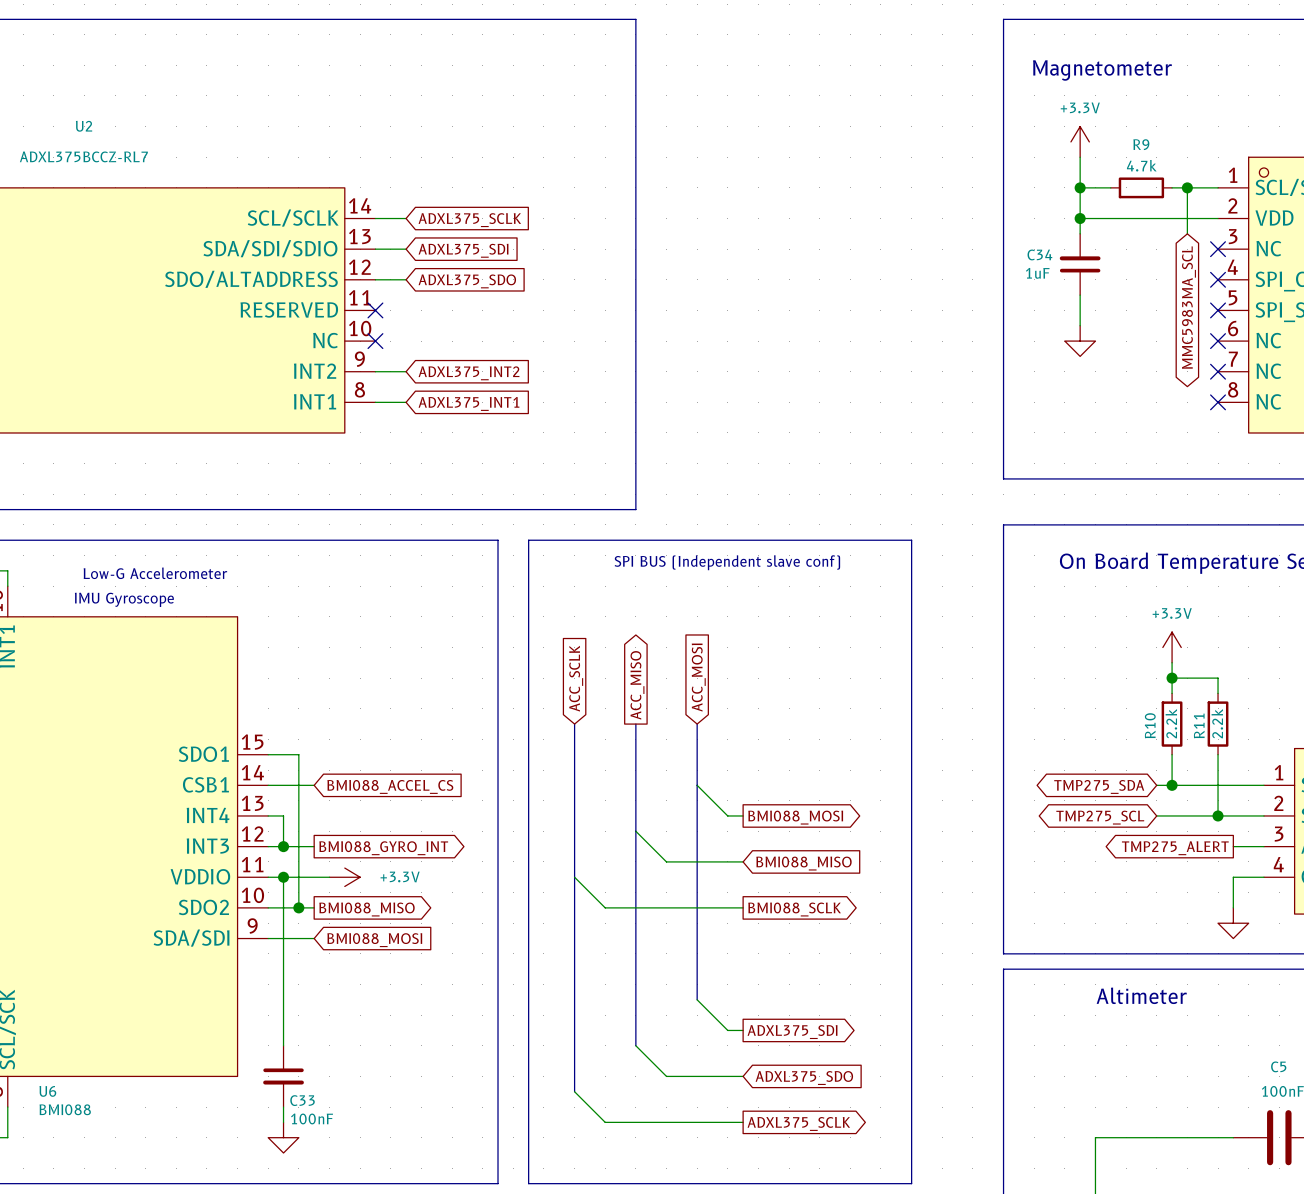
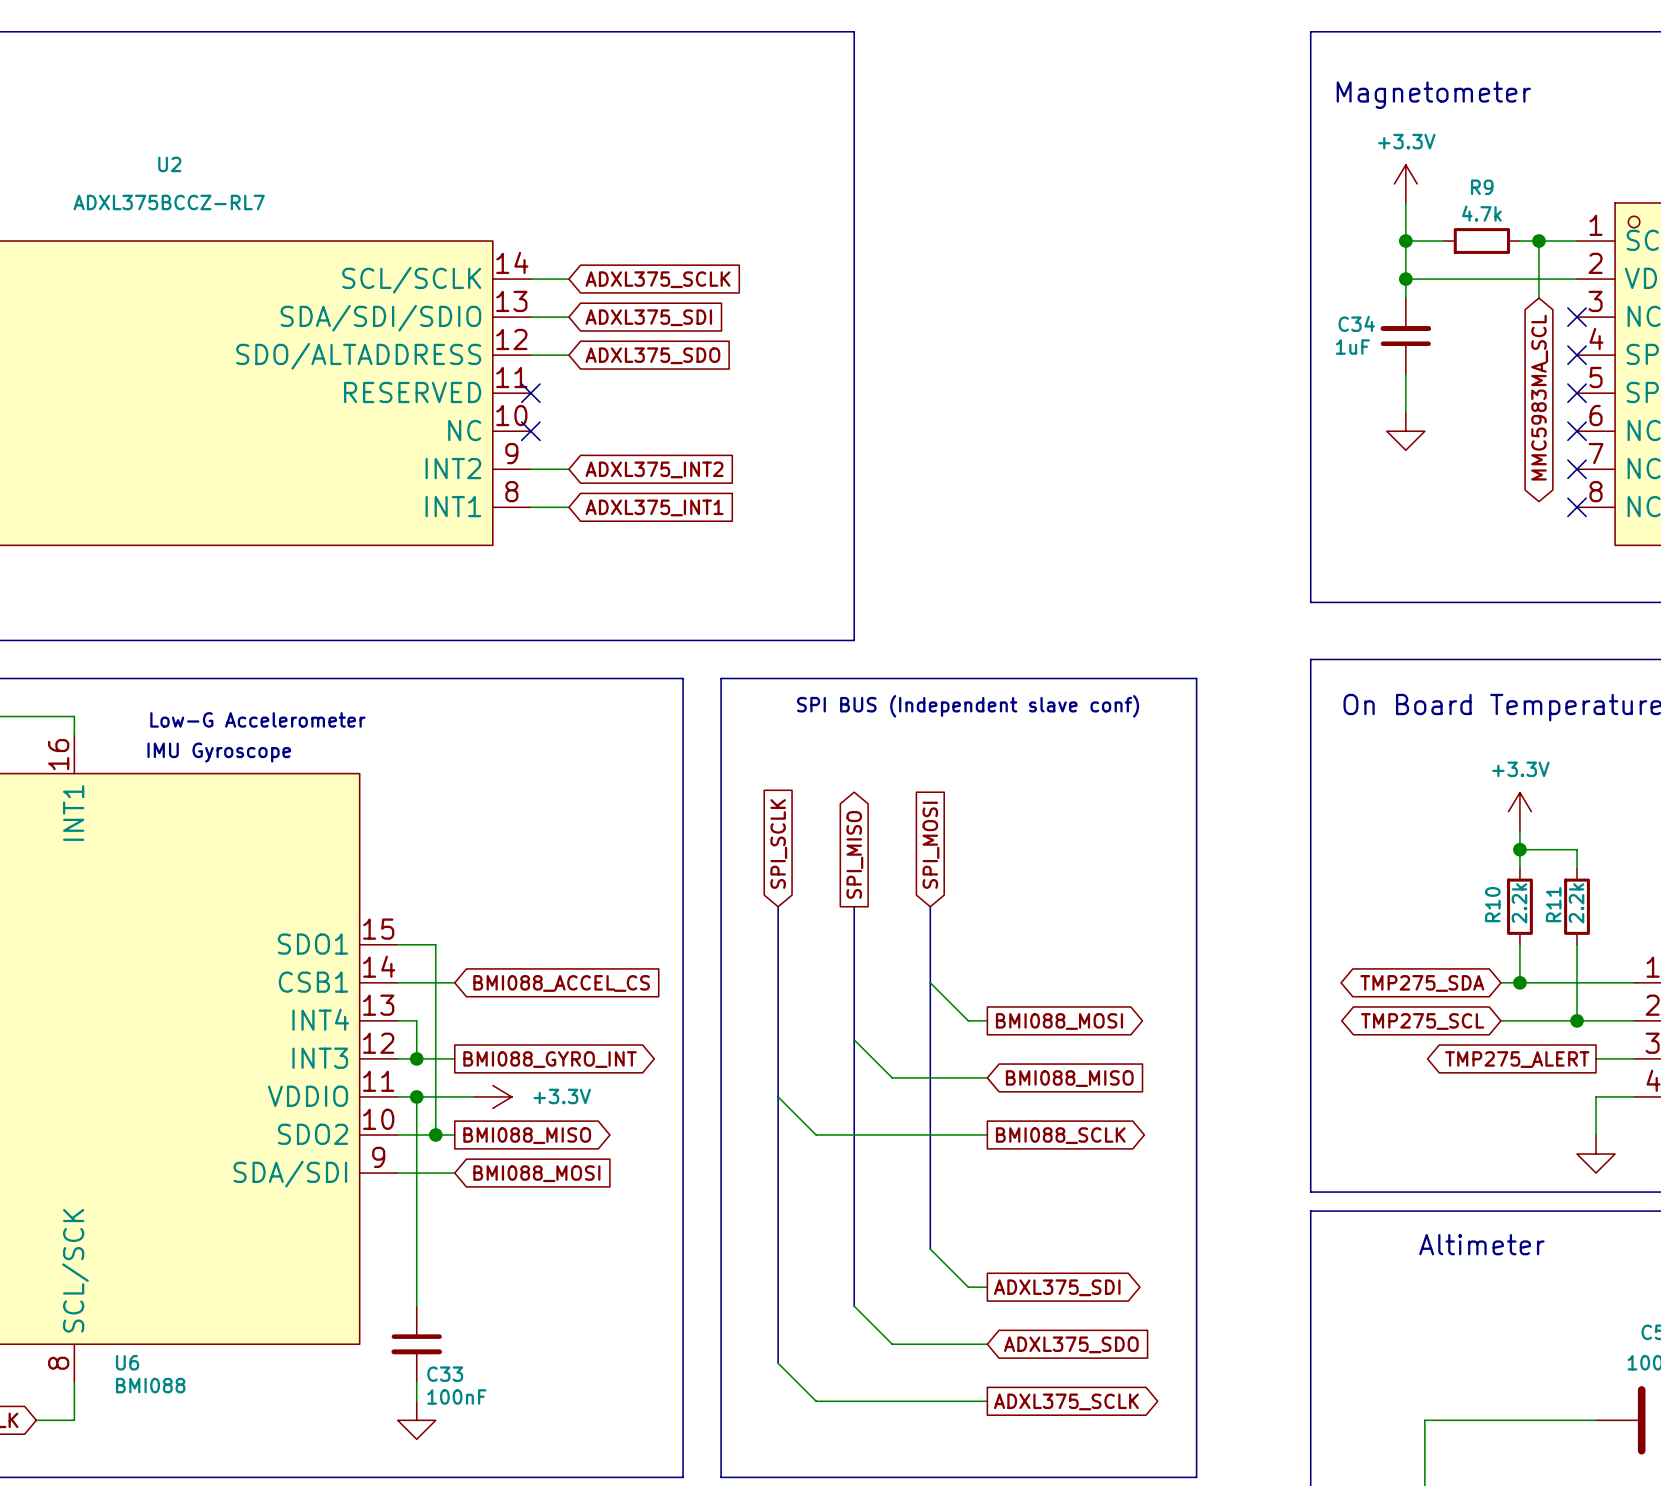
global label: ACC_MOSI (698, 677) -> SPI_MOSI (930, 845)
global label: ACC_SCLK (576, 678) -> SPI_SCLK (778, 843)
global label: ACC_MISO (637, 685) -> SPI_MISO (854, 854)

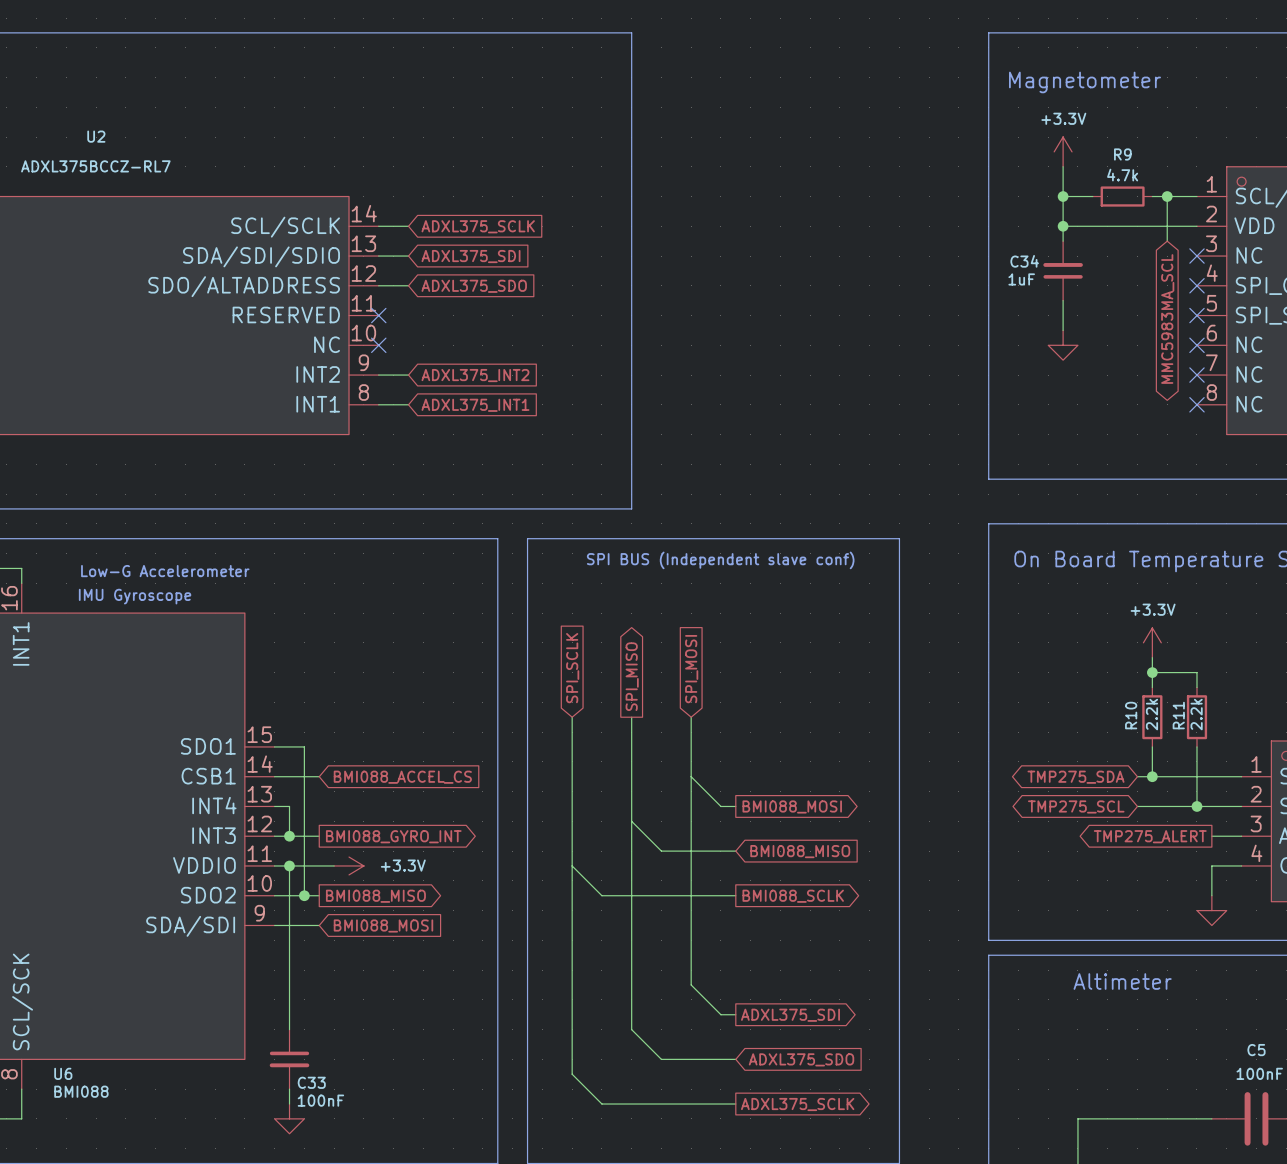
bus: (778, 906) (778, 1363) -> none
bus: (854, 906) (854, 1306) -> none
bus: (930, 906) (930, 1249) -> none

